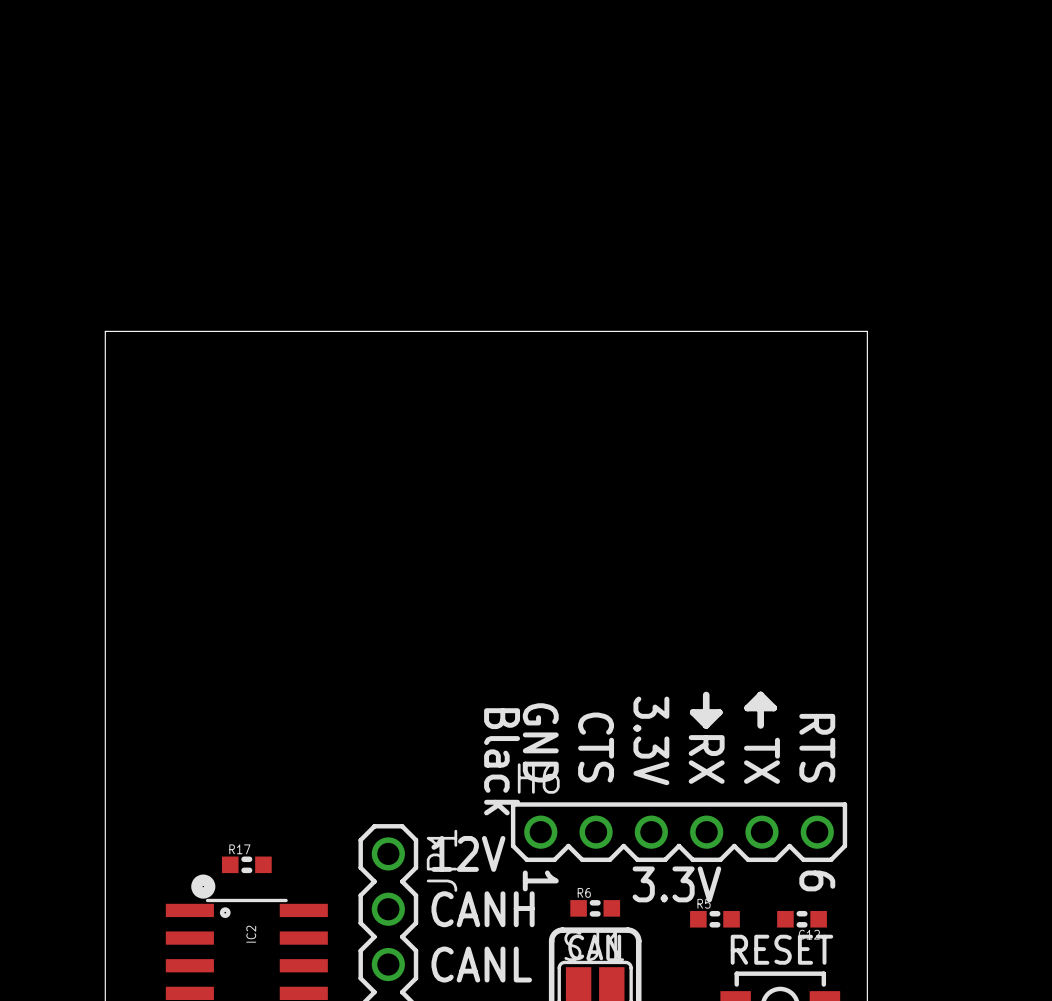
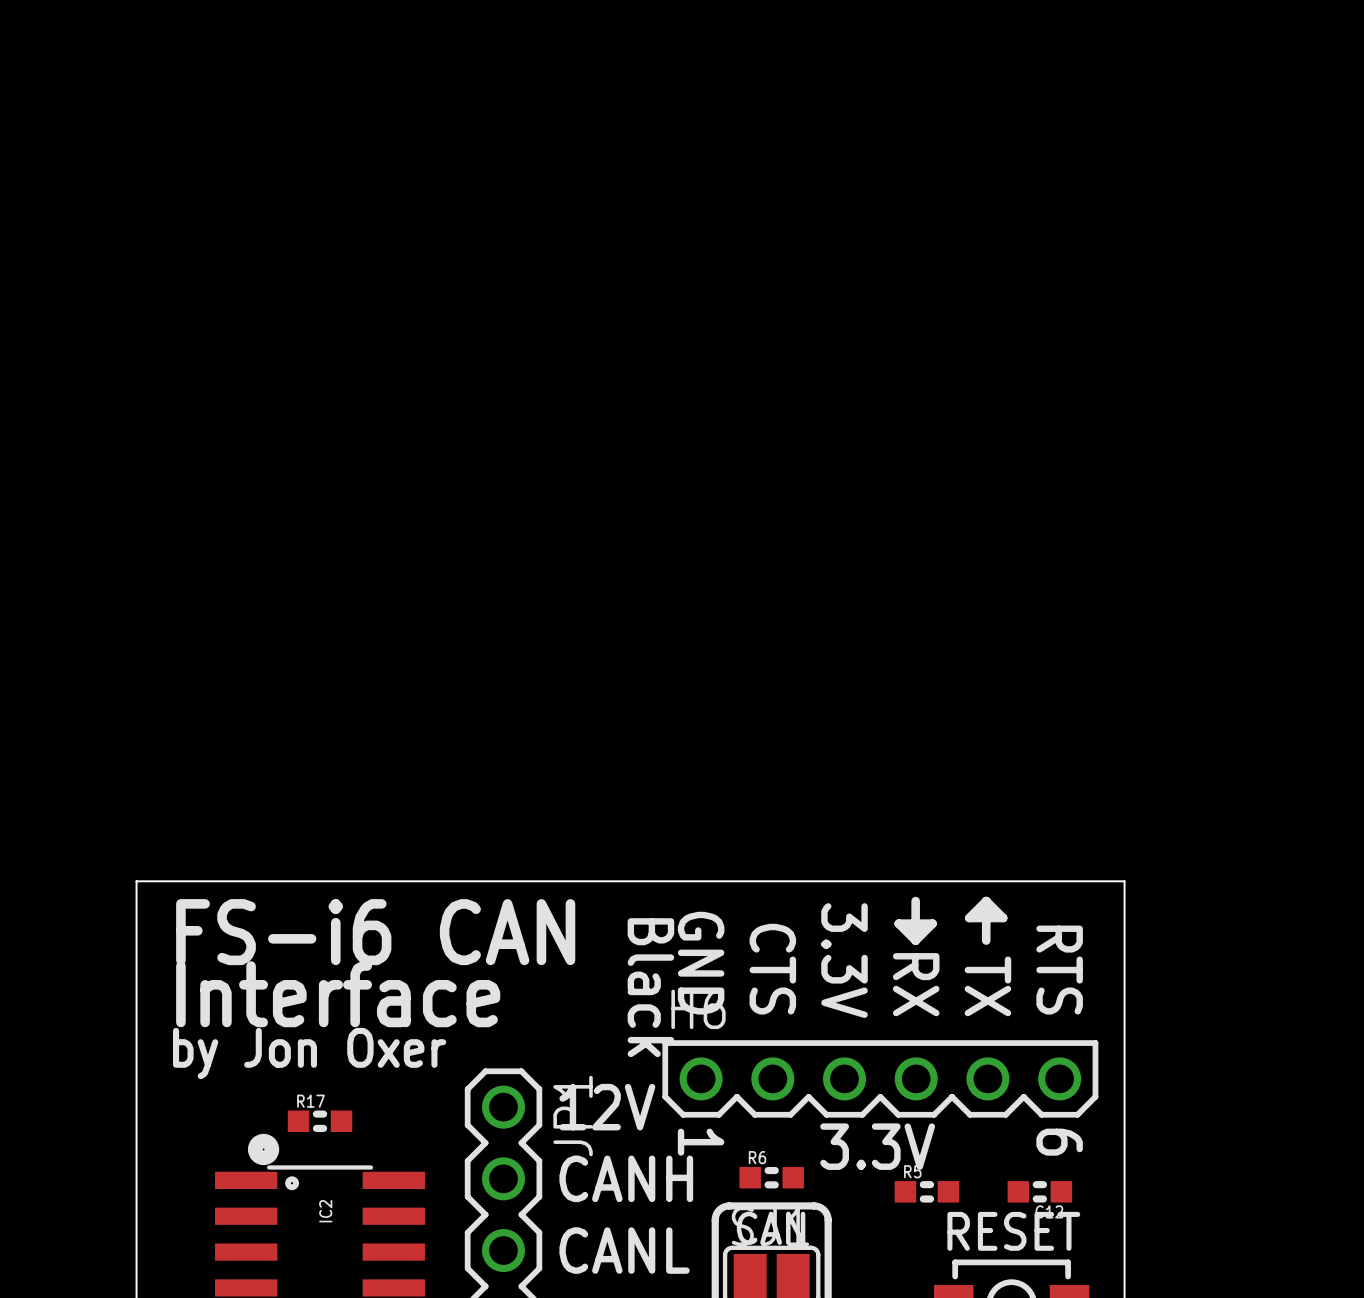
board edge: (105, 679) (105, 331) (867, 331) (867, 679) -> (136, 881) (1124, 881)
text: none -> FS-i6 CAN (375, 932)
text: none -> Interface (338, 994)
text: none -> by Jon Oxer (309, 1053)

